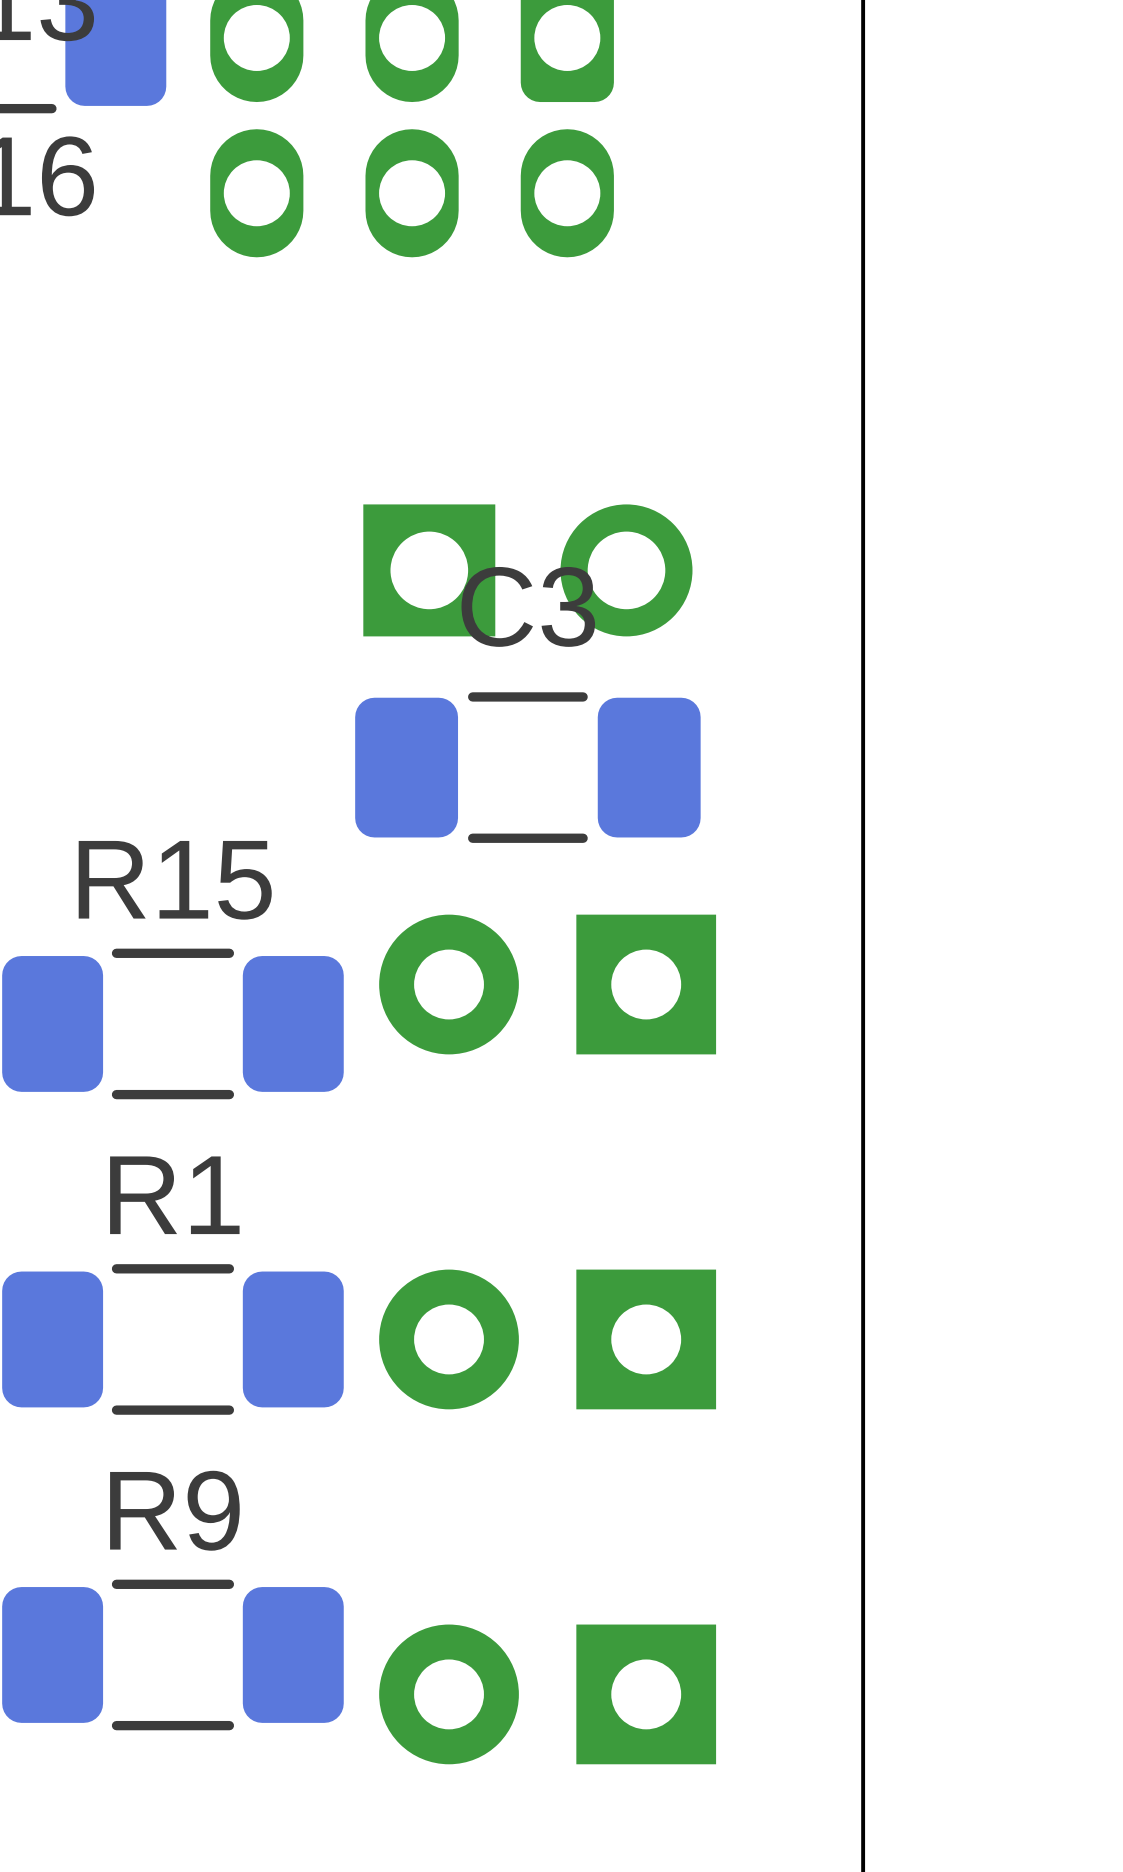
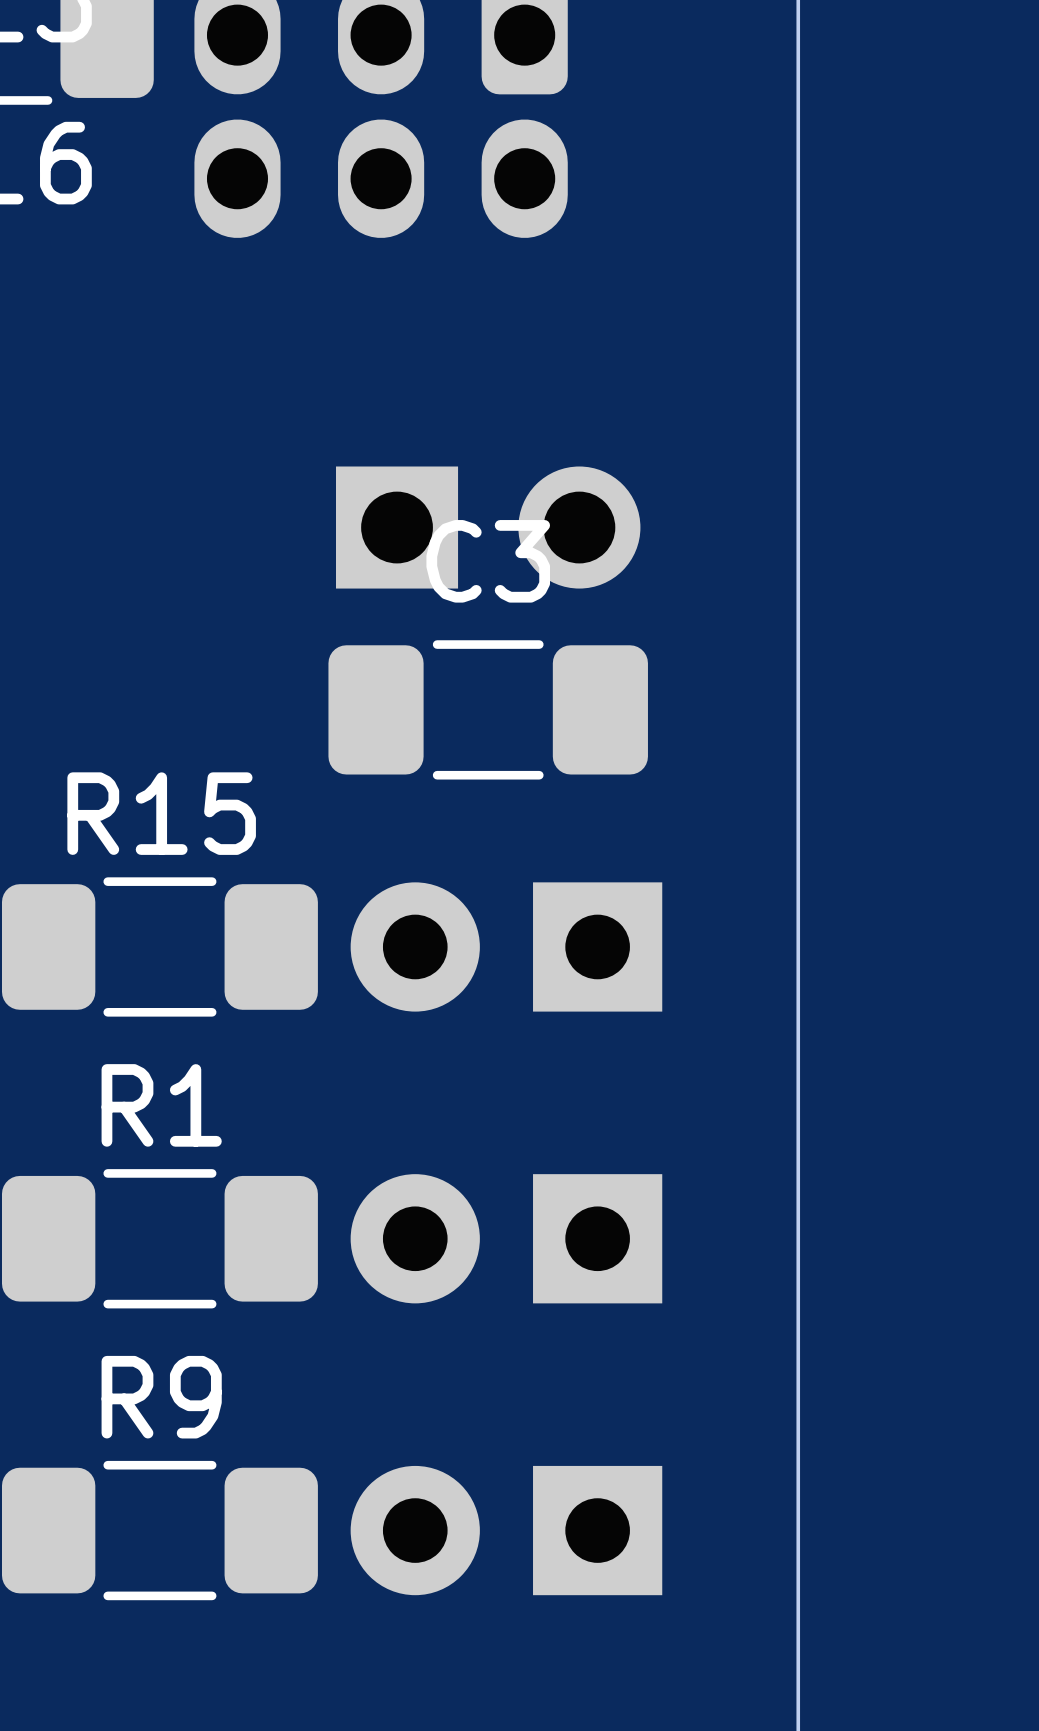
part position: (547, 984) -> (506, 946)
part position: (547, 1694) -> (506, 1530)

